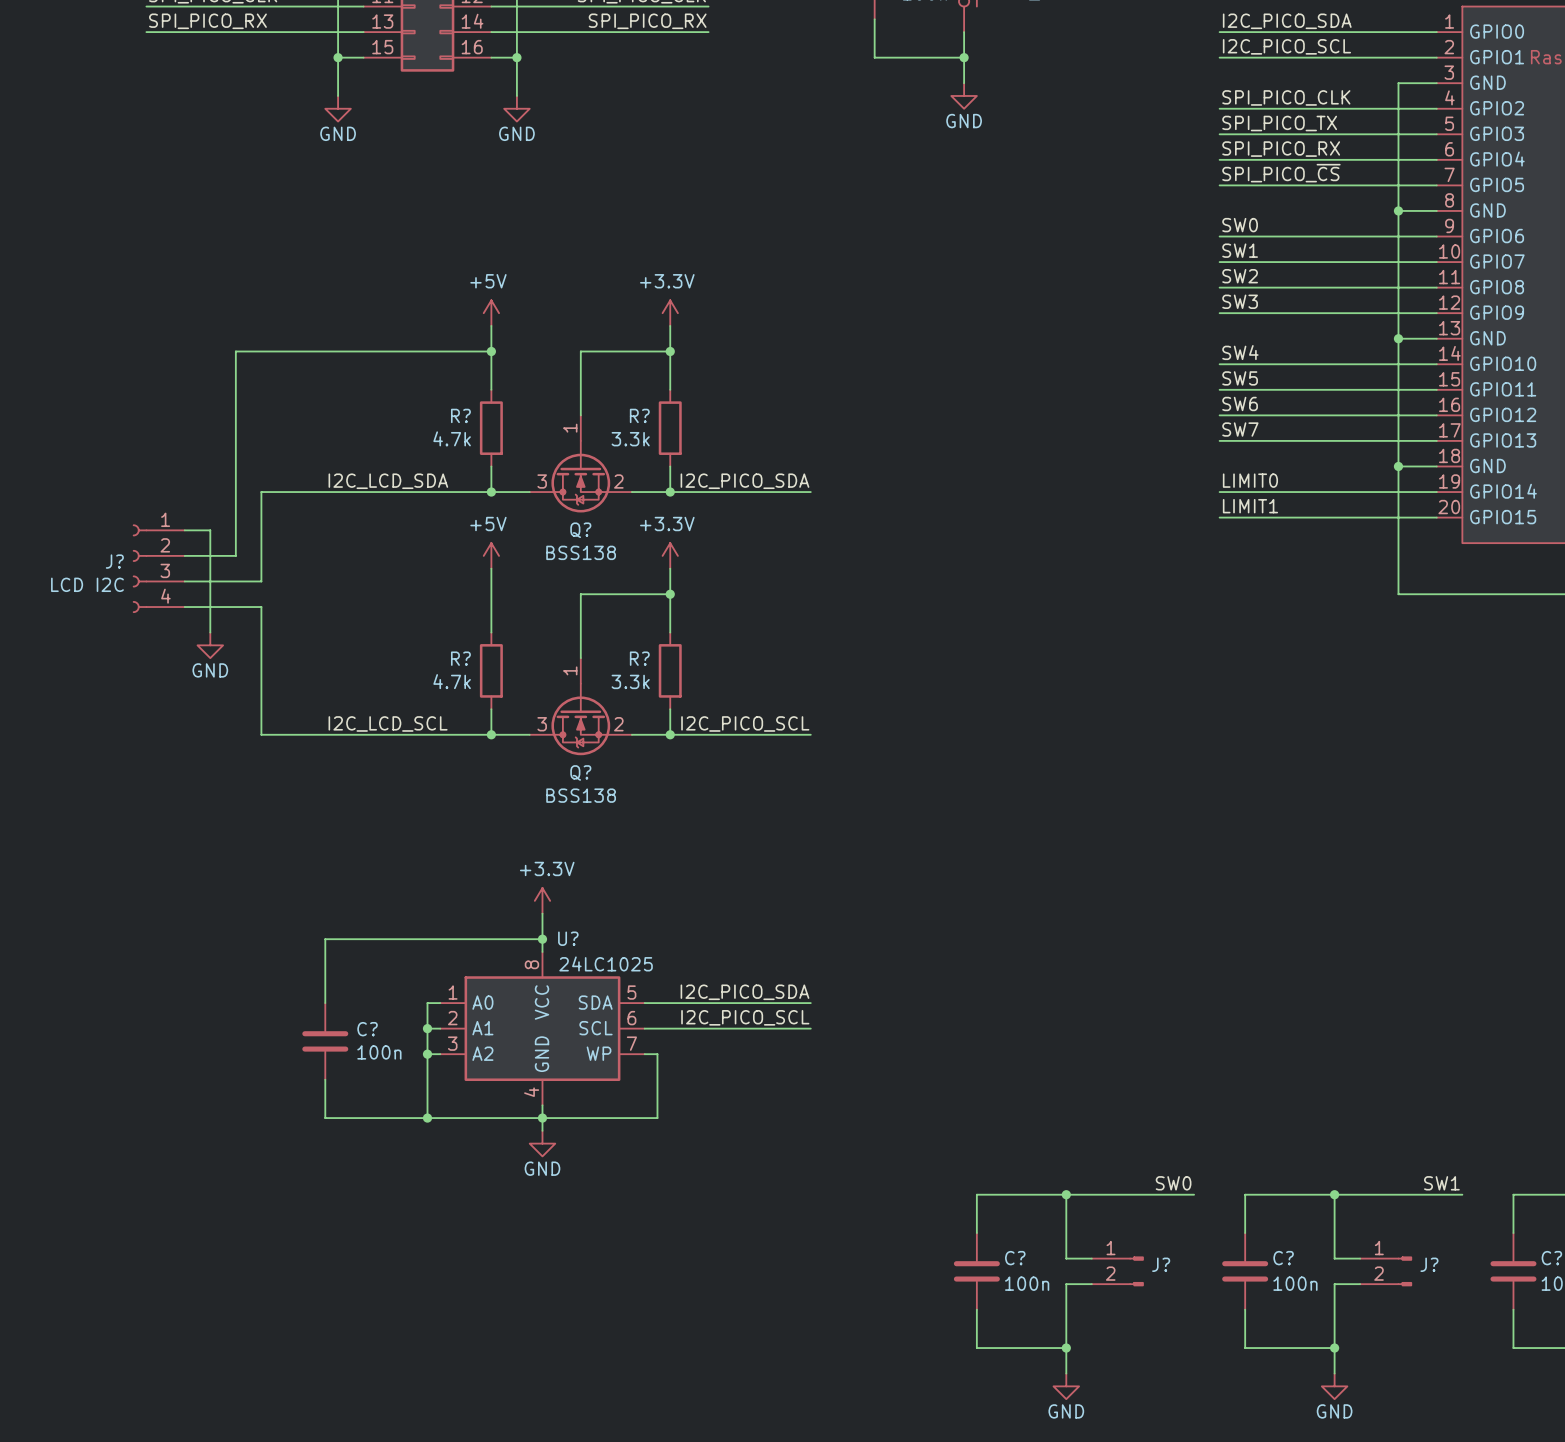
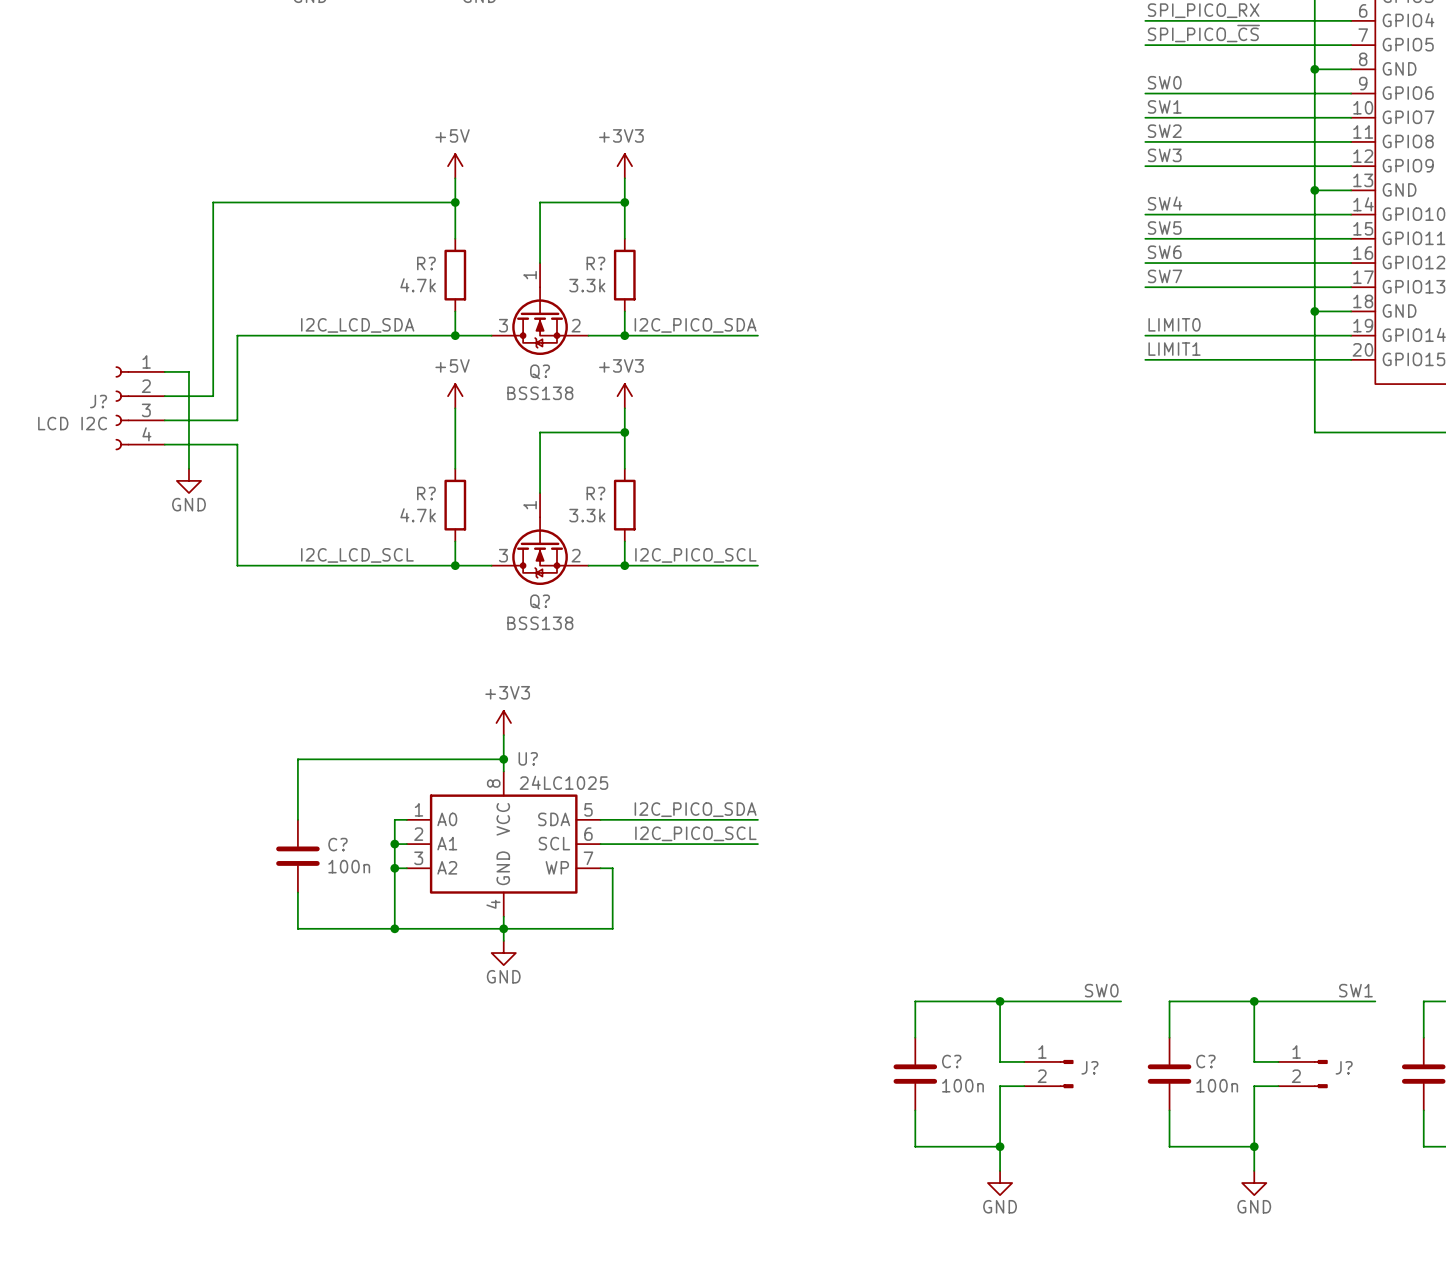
power symbol: +3.3V (670, 313) -> +3V3 (624, 166)
power symbol: +3.3V (670, 555) -> +3V3 (624, 396)
power symbol: +3.3V (542, 900) -> +3V3 (503, 723)

